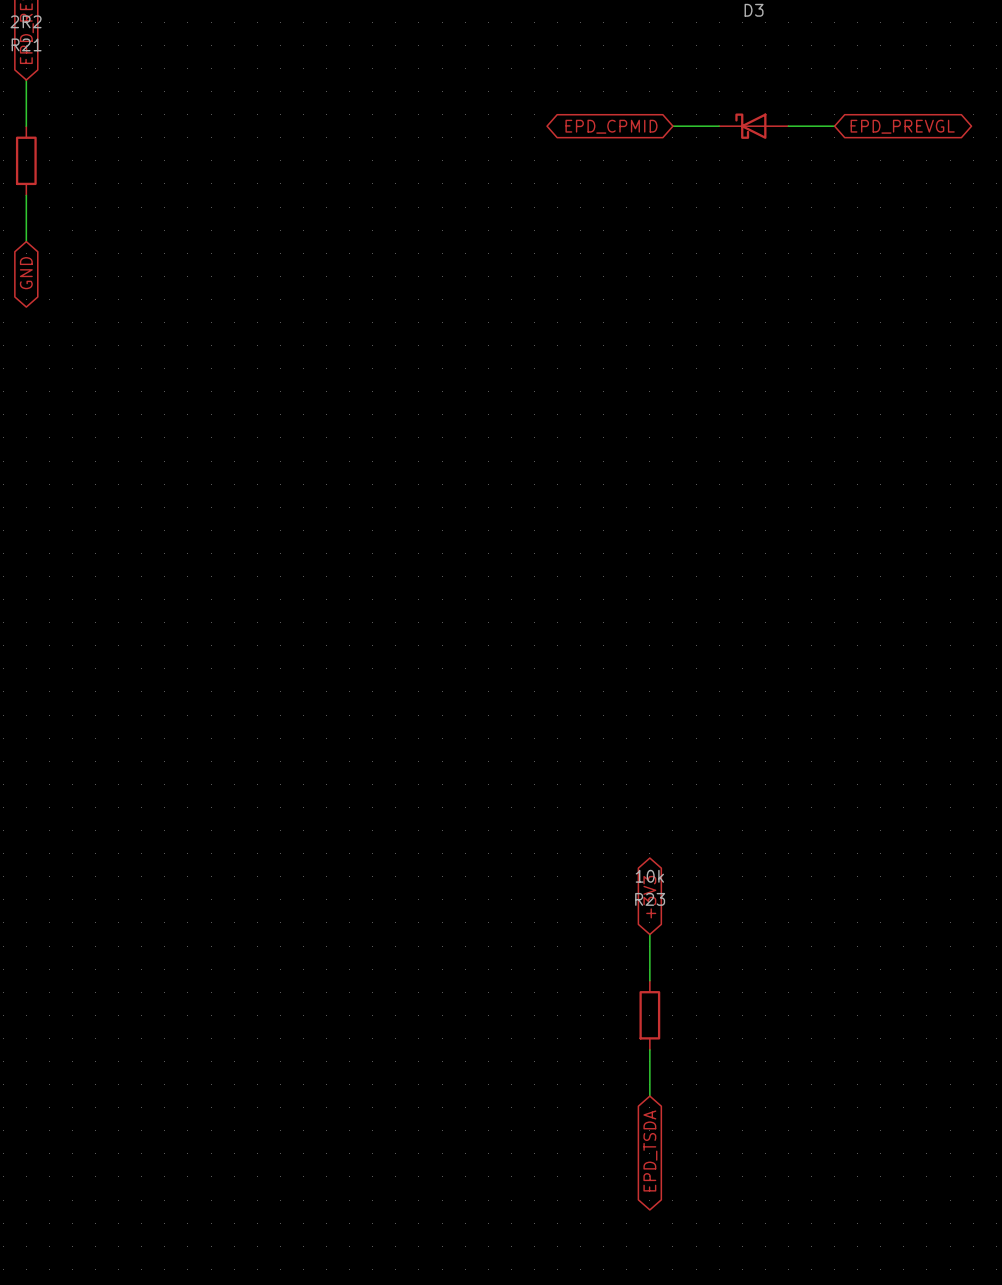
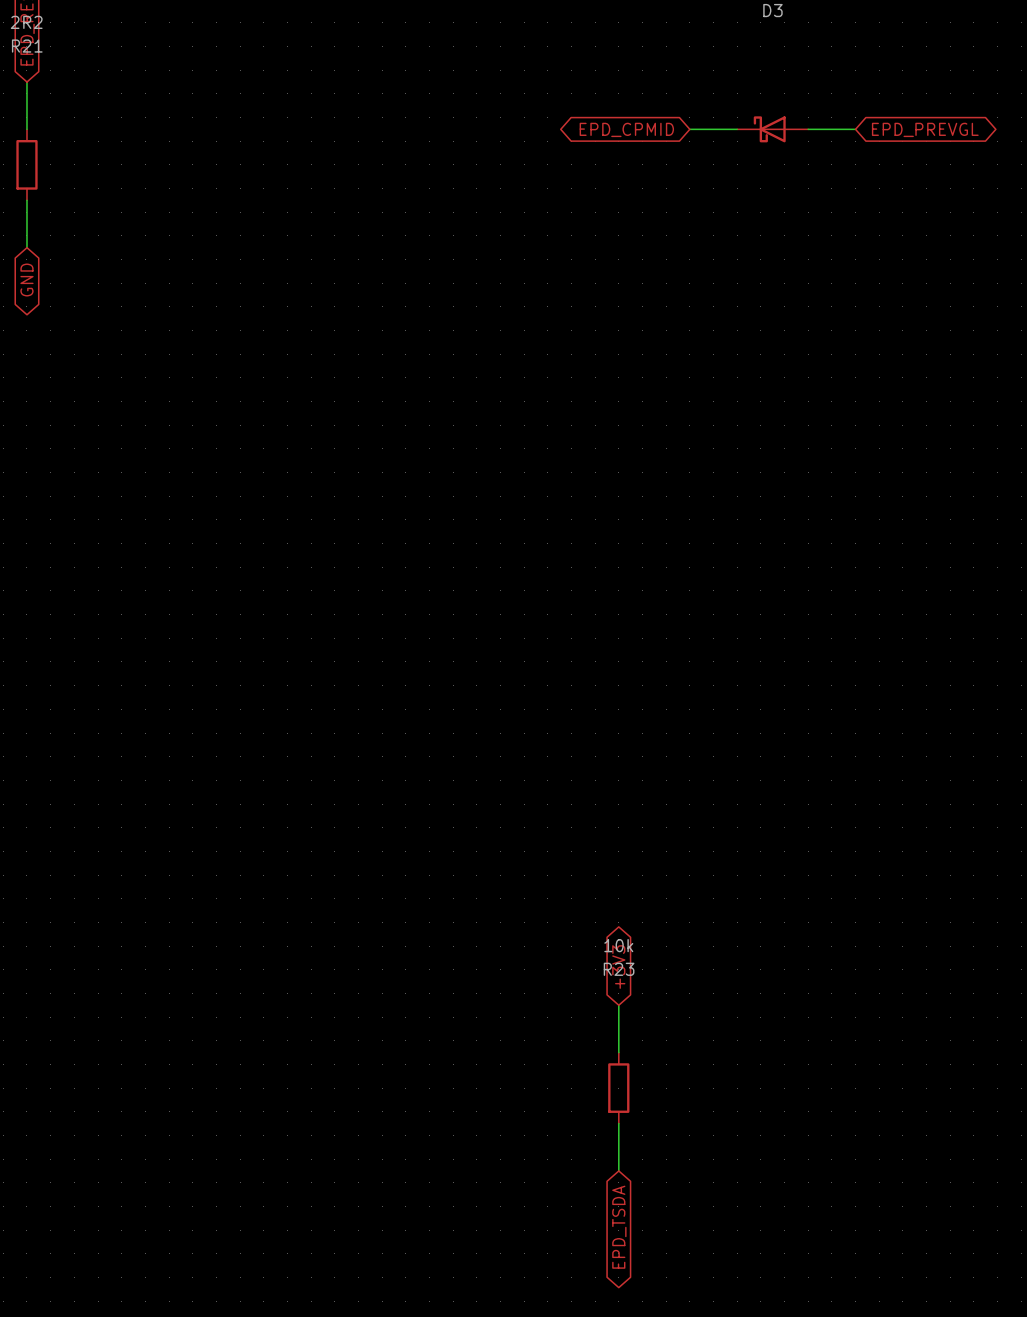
global label position: +3V3 (649, 897) -> +3V3 (618, 967)
wire: (649, 934) (649, 980) -> (618, 1005) (618, 1052)
R23 position: (649, 1015) -> (618, 1088)
wire: (649, 1049) (649, 1096) -> (618, 1123) (618, 1170)
global label position: EPD_TSDA (650, 1150) -> EPD_TSDA (619, 1227)

